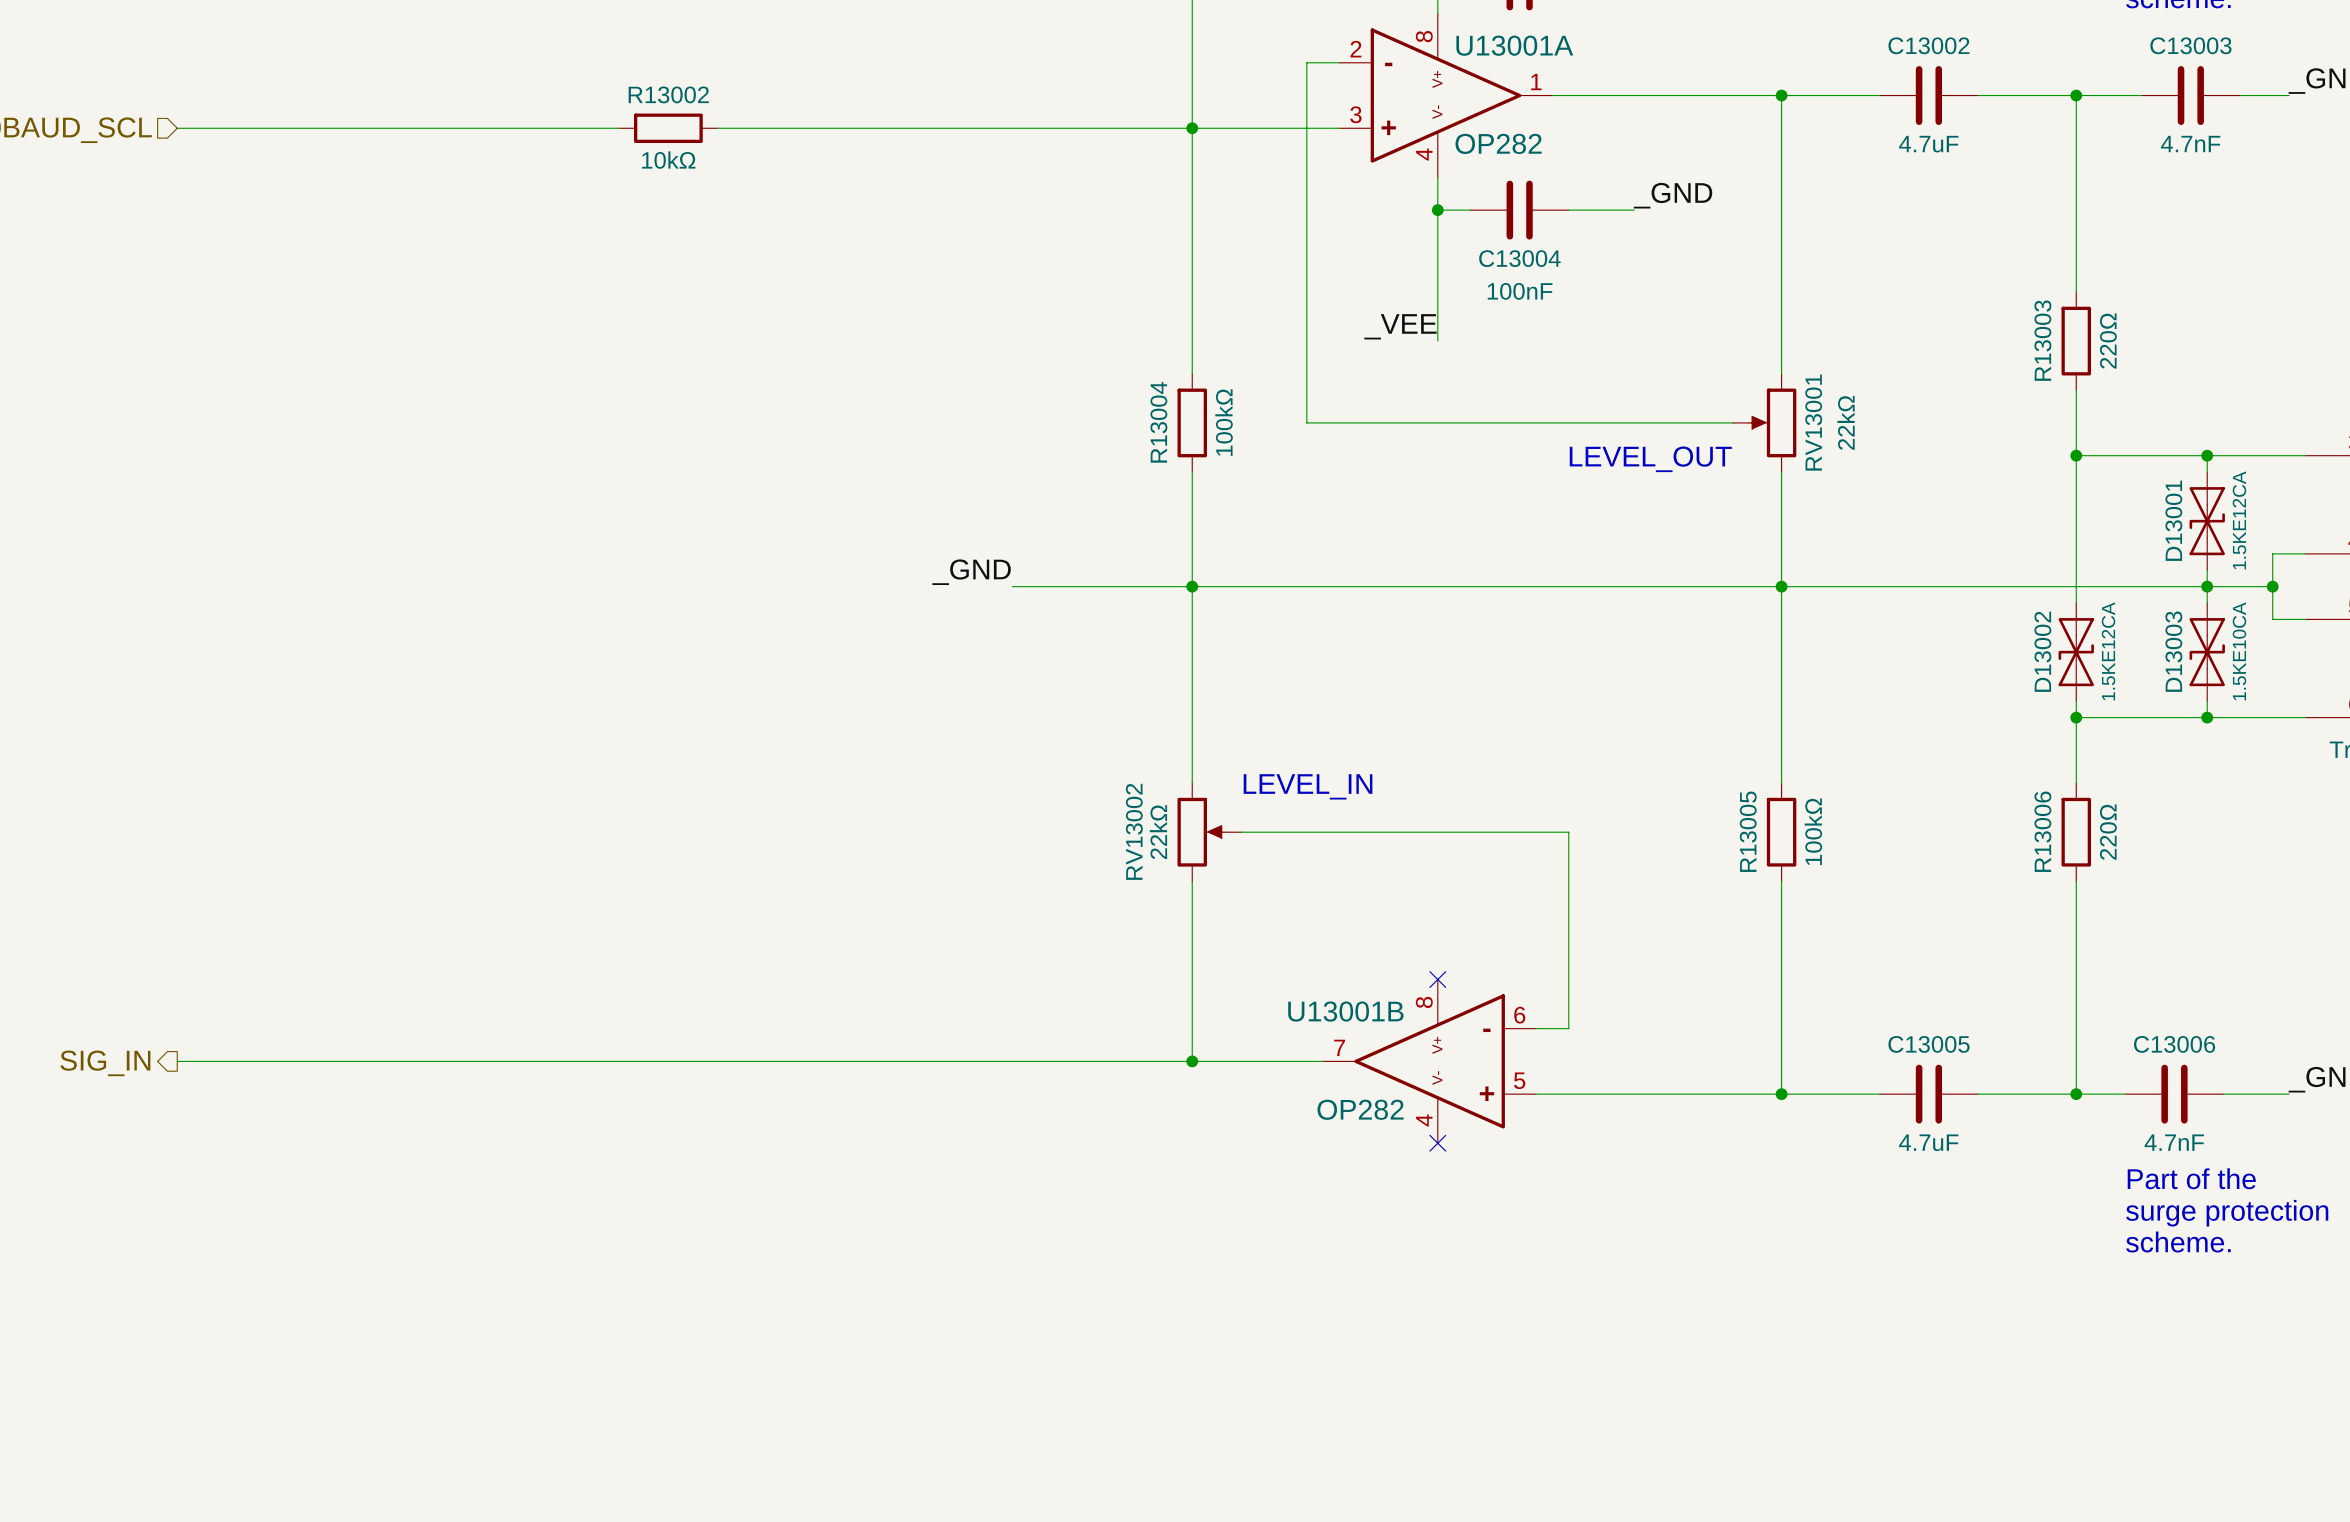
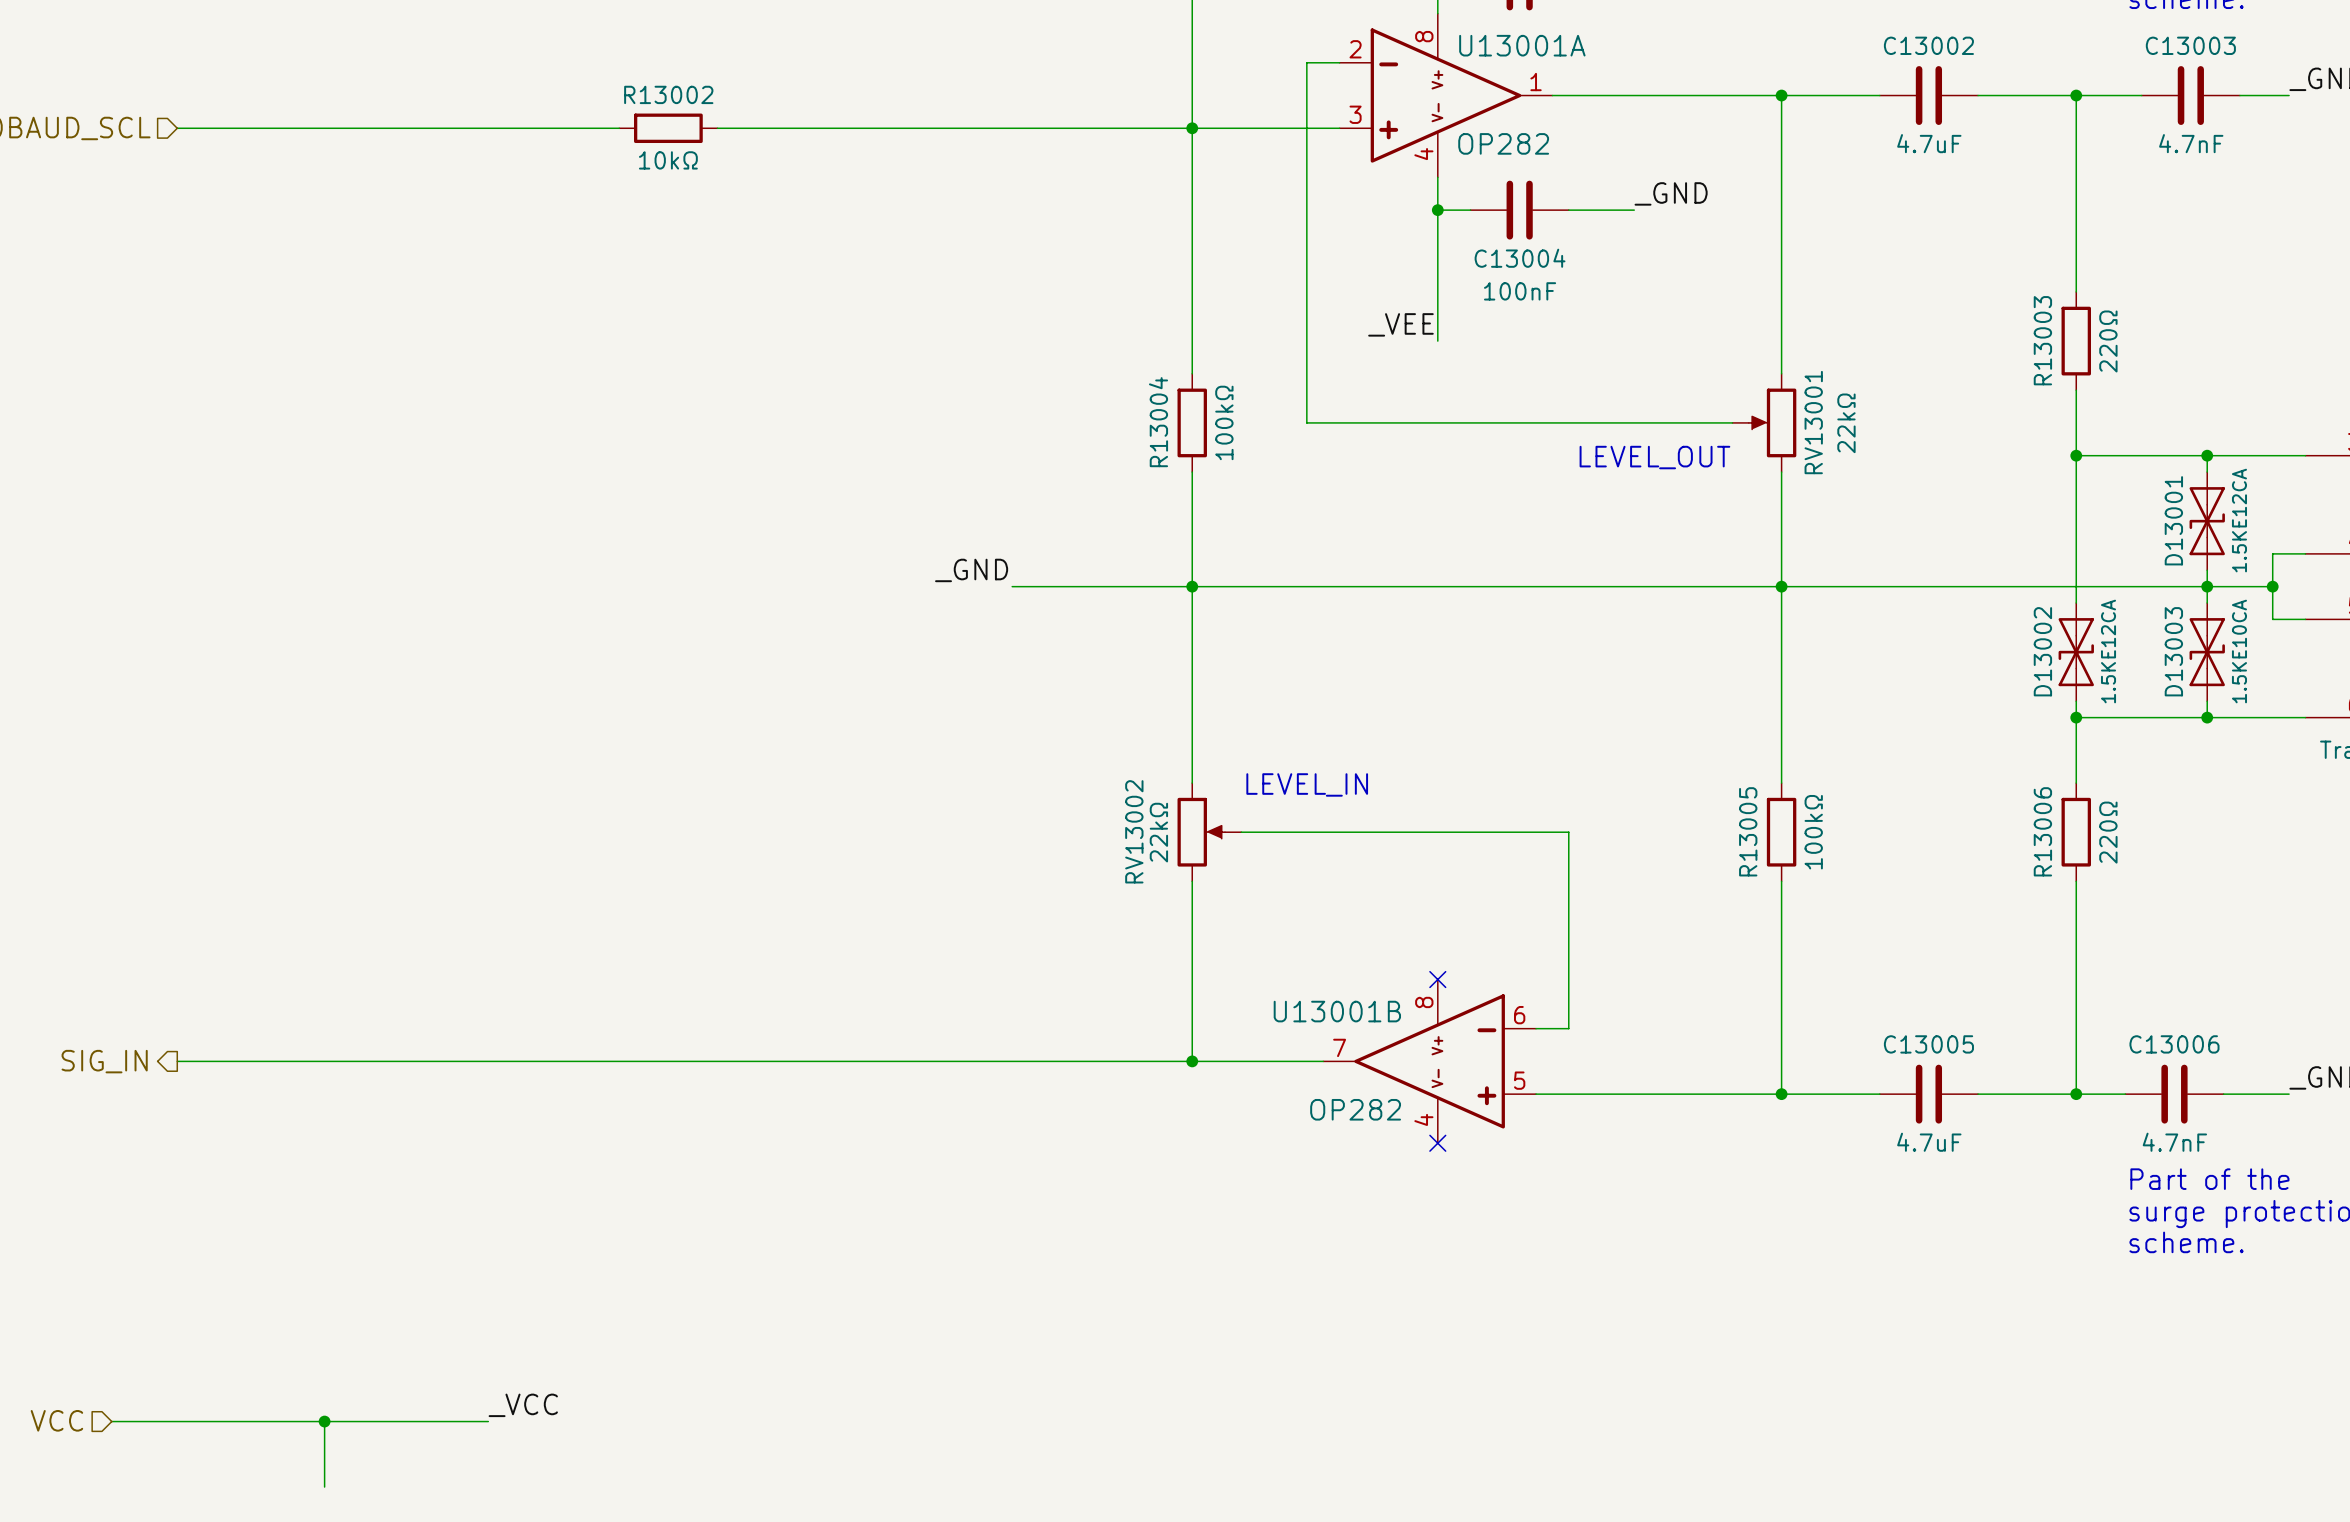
label: none -> _VCC (523, 1405)
hierarchical label: none -> VCC (56, 1420)
wire: none -> (111, 1421) (488, 1421)
wire: none -> (324, 1421) (324, 1487)
junction: none -> (324, 1421)

